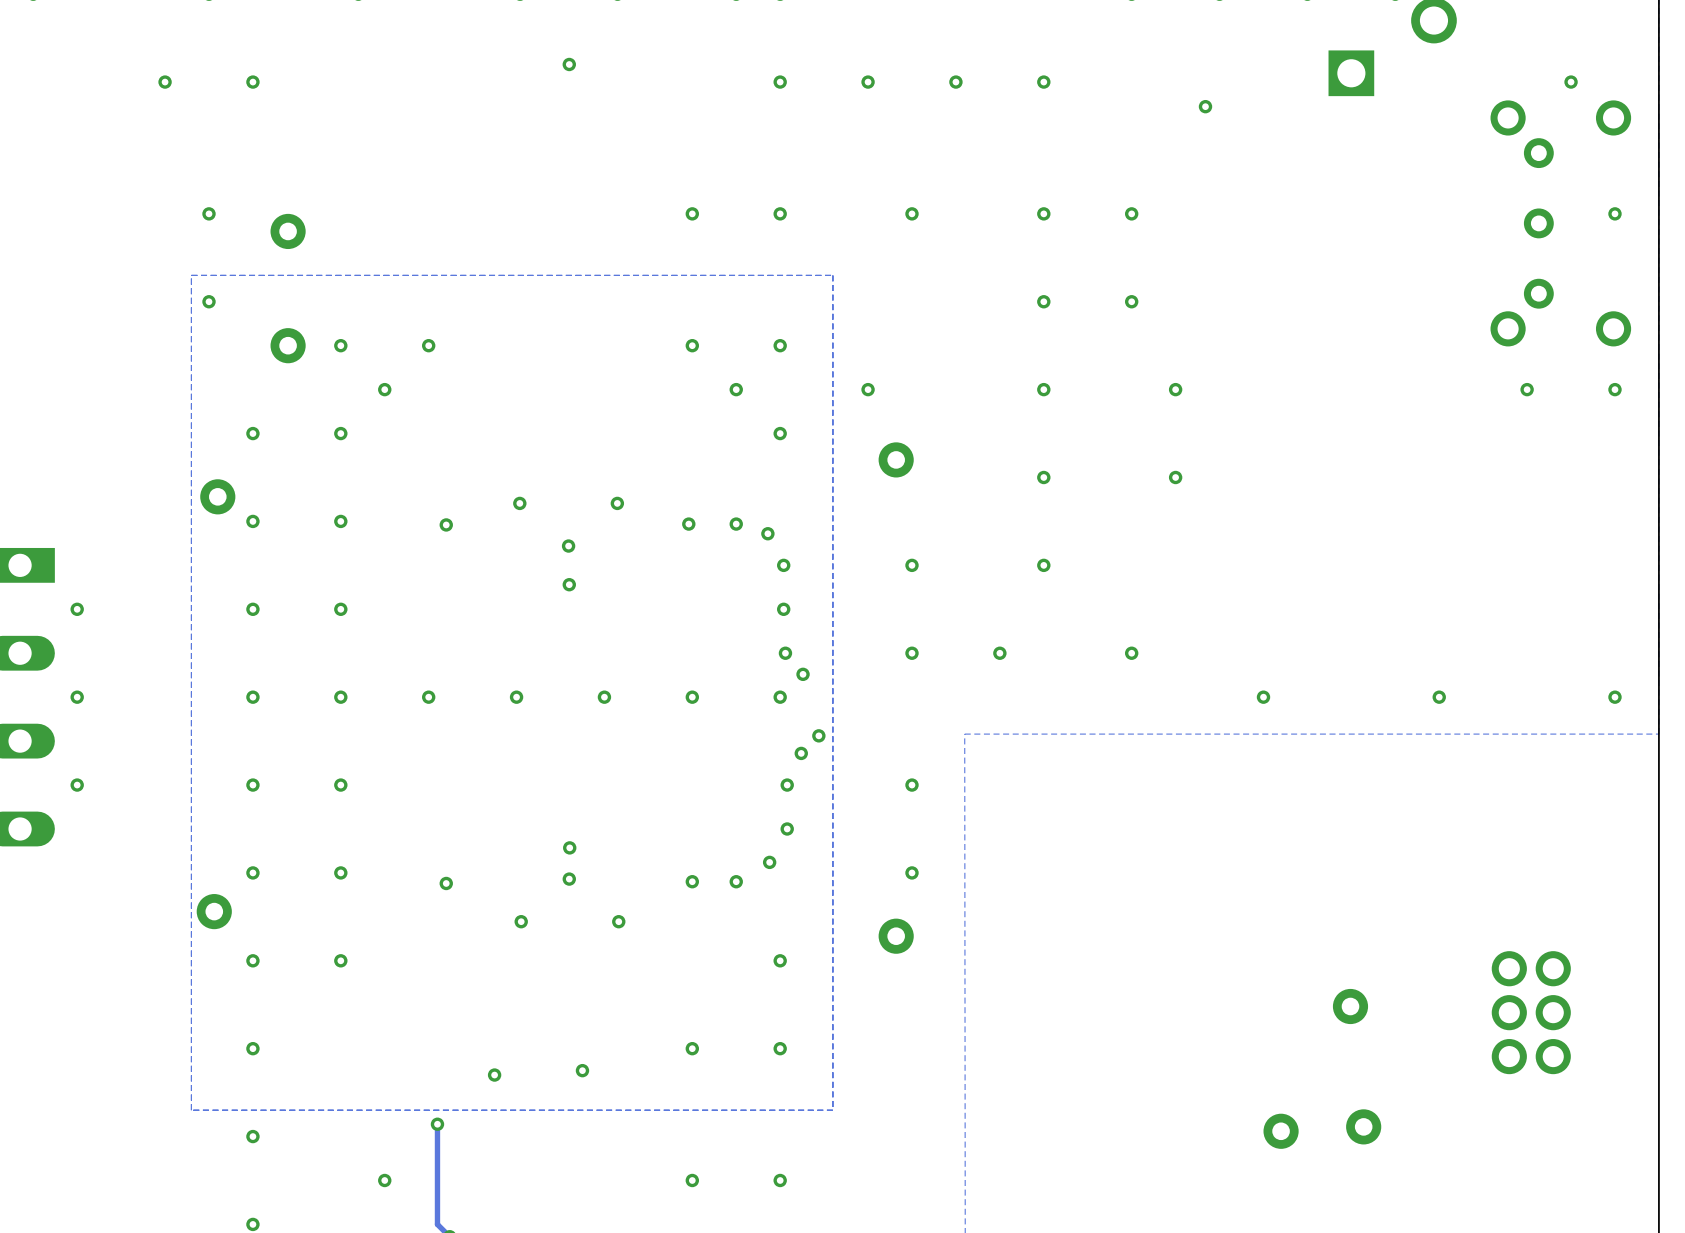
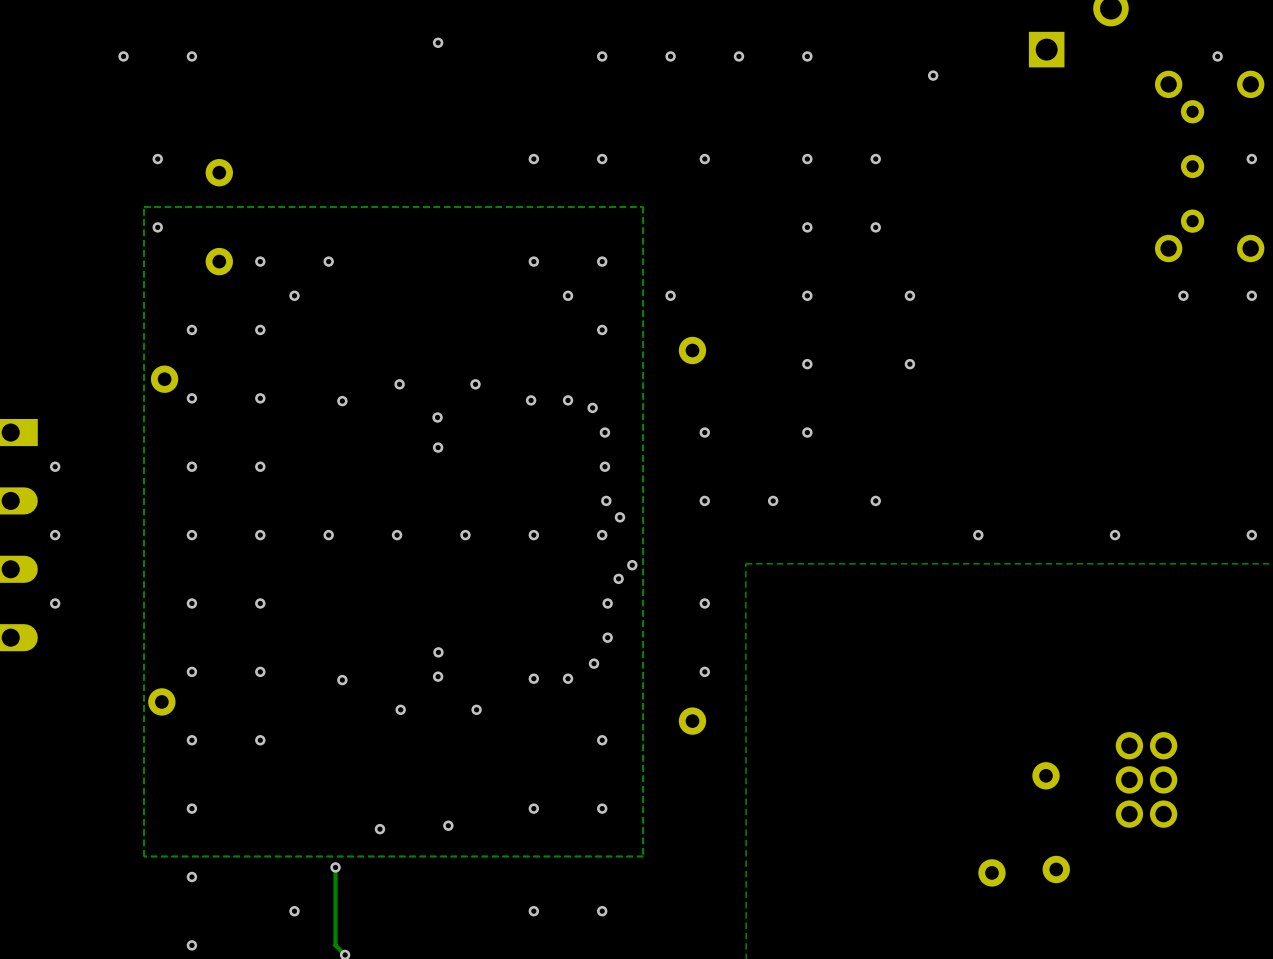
part position: (1531, 1012) -> (1146, 779)

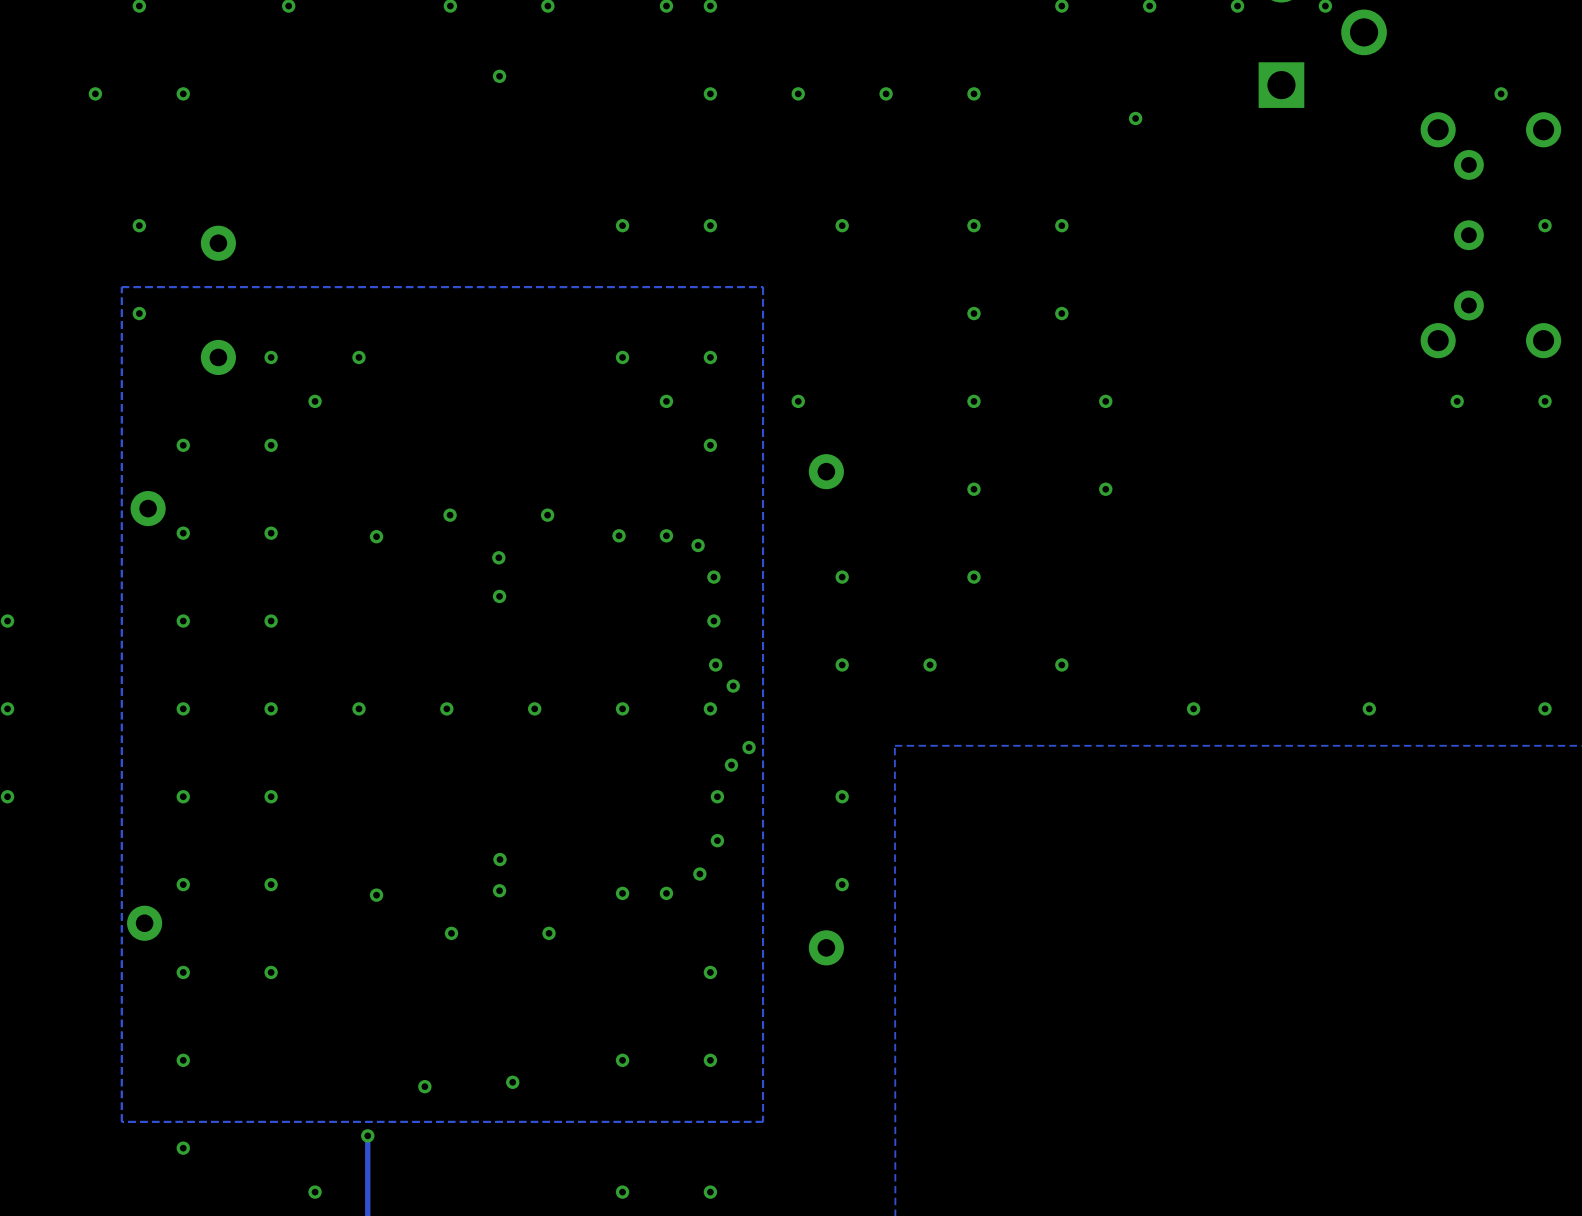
part: (1046, 775) -> none
part: (1146, 779) -> none
part: (1056, 869) -> none
part: (991, 872) -> none

